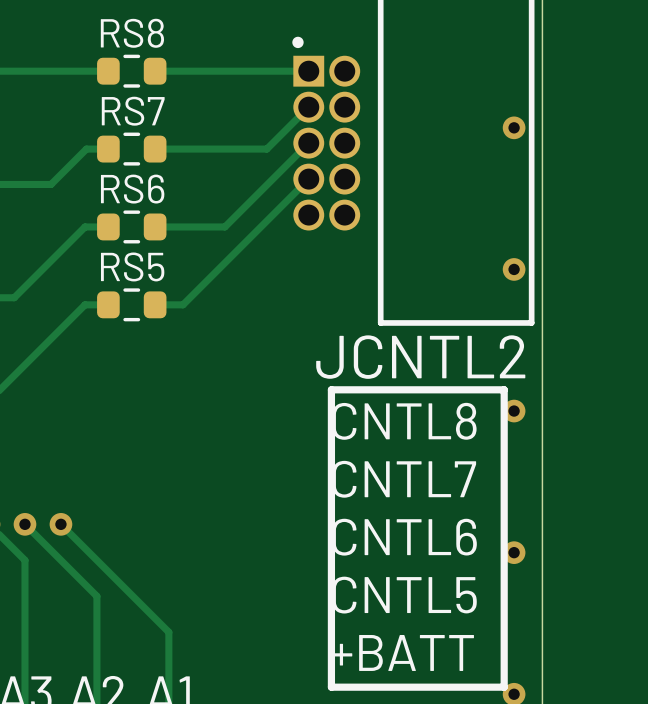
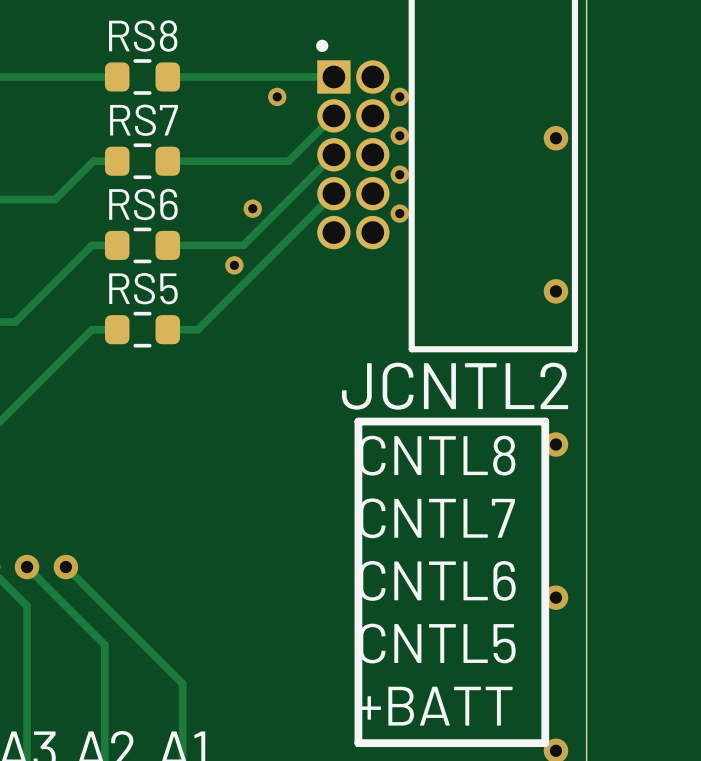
via: none -> (277, 96)
via: none -> (399, 96)
via: none -> (399, 135)
via: none -> (399, 174)
via: none -> (252, 208)
via: none -> (399, 213)
via: none -> (234, 265)

